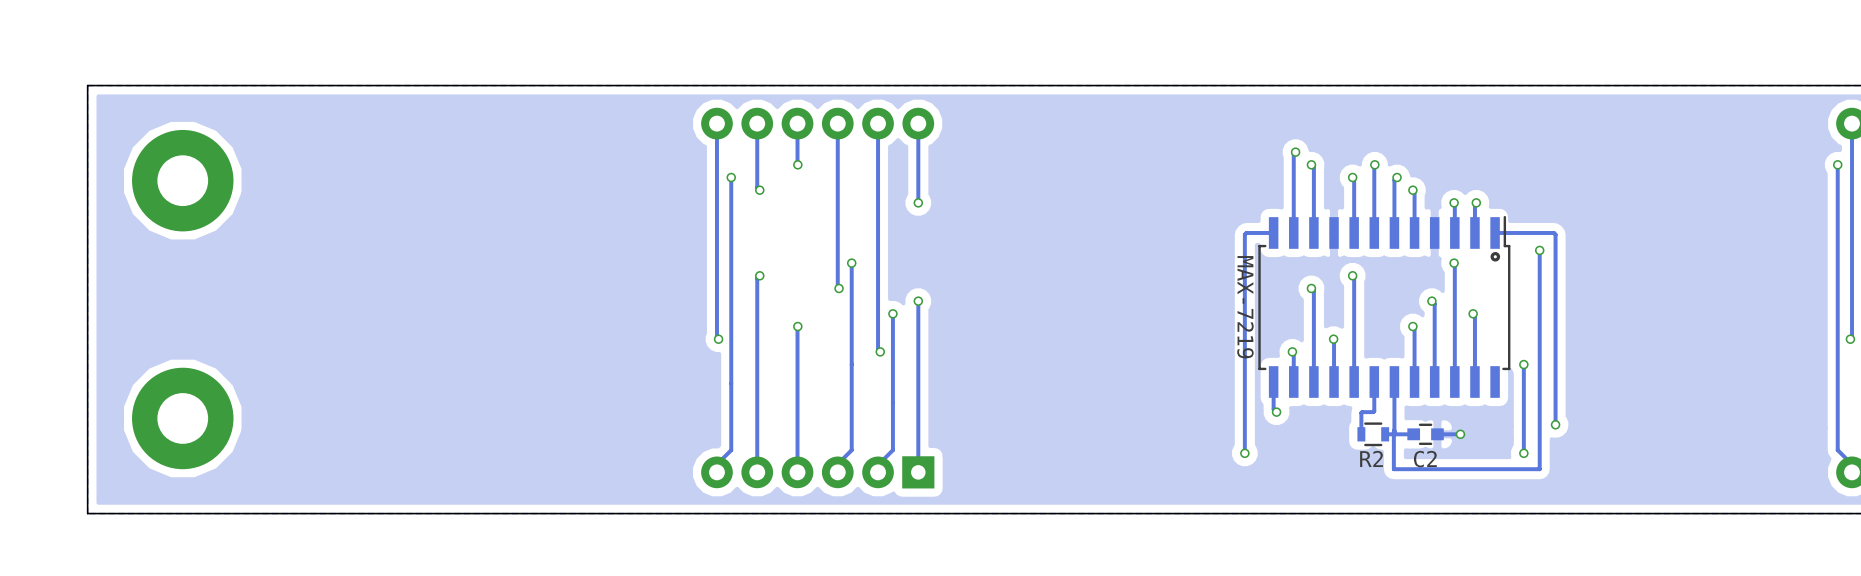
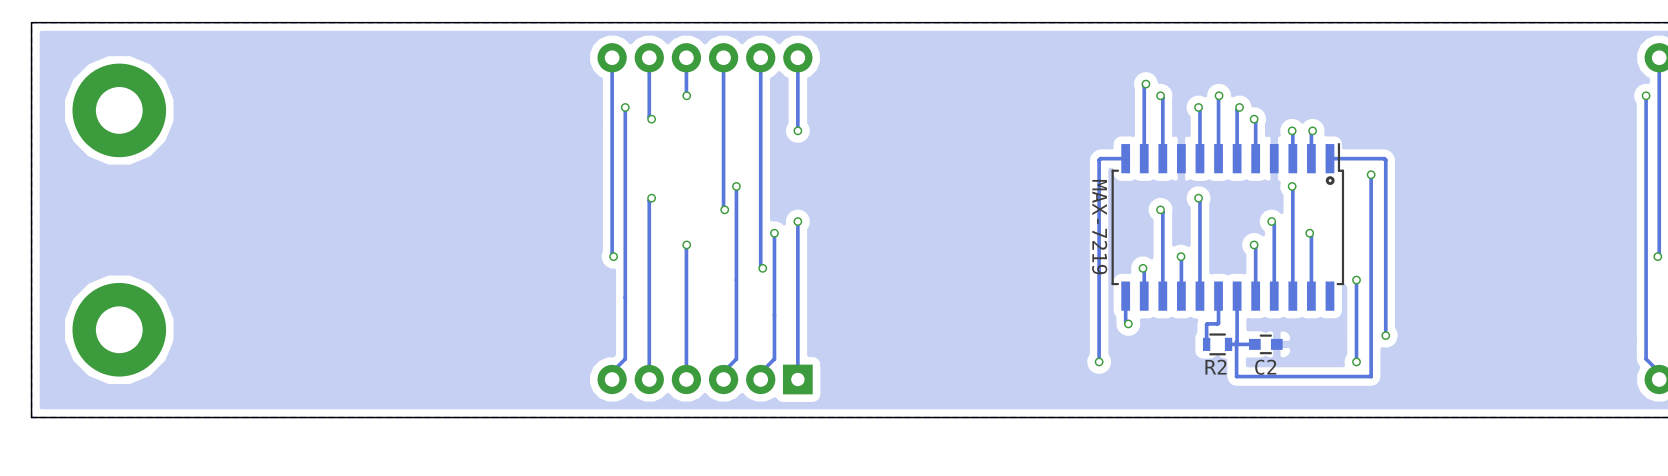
track: (1460, 434) (1437, 434) -> none
via: (1460, 434) -> none

